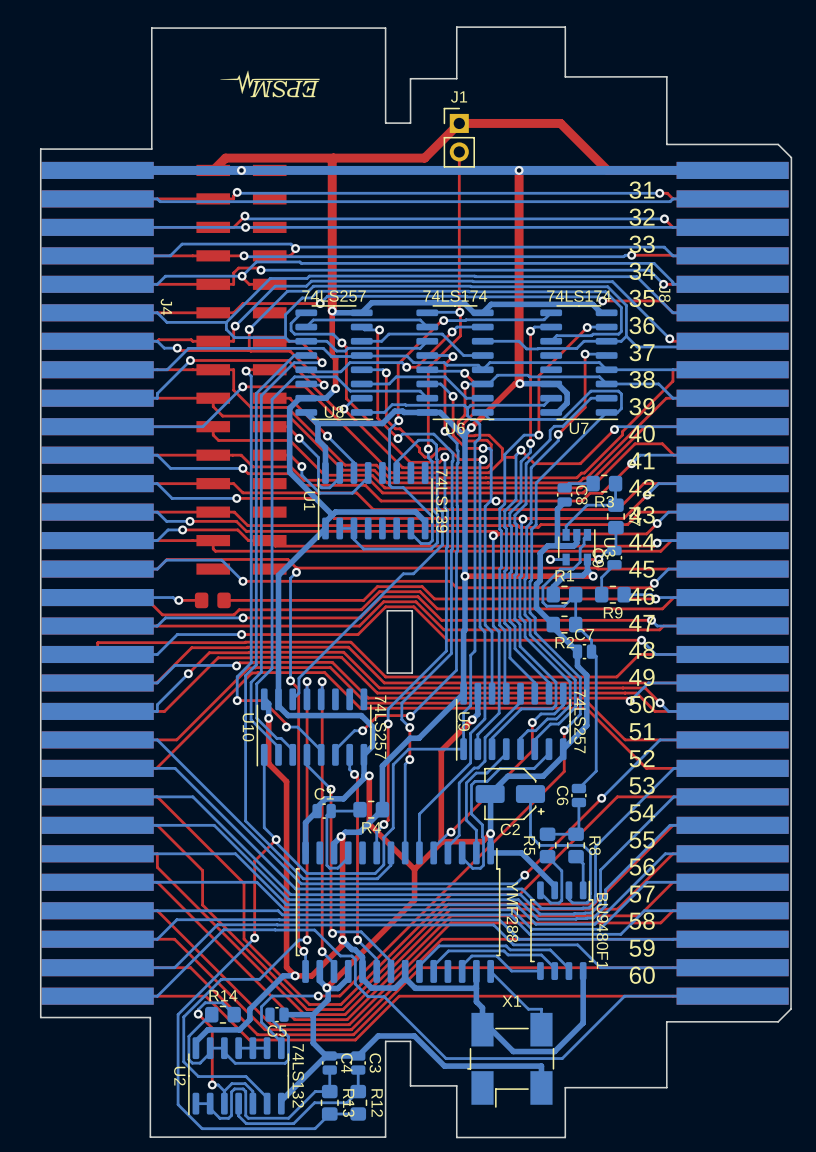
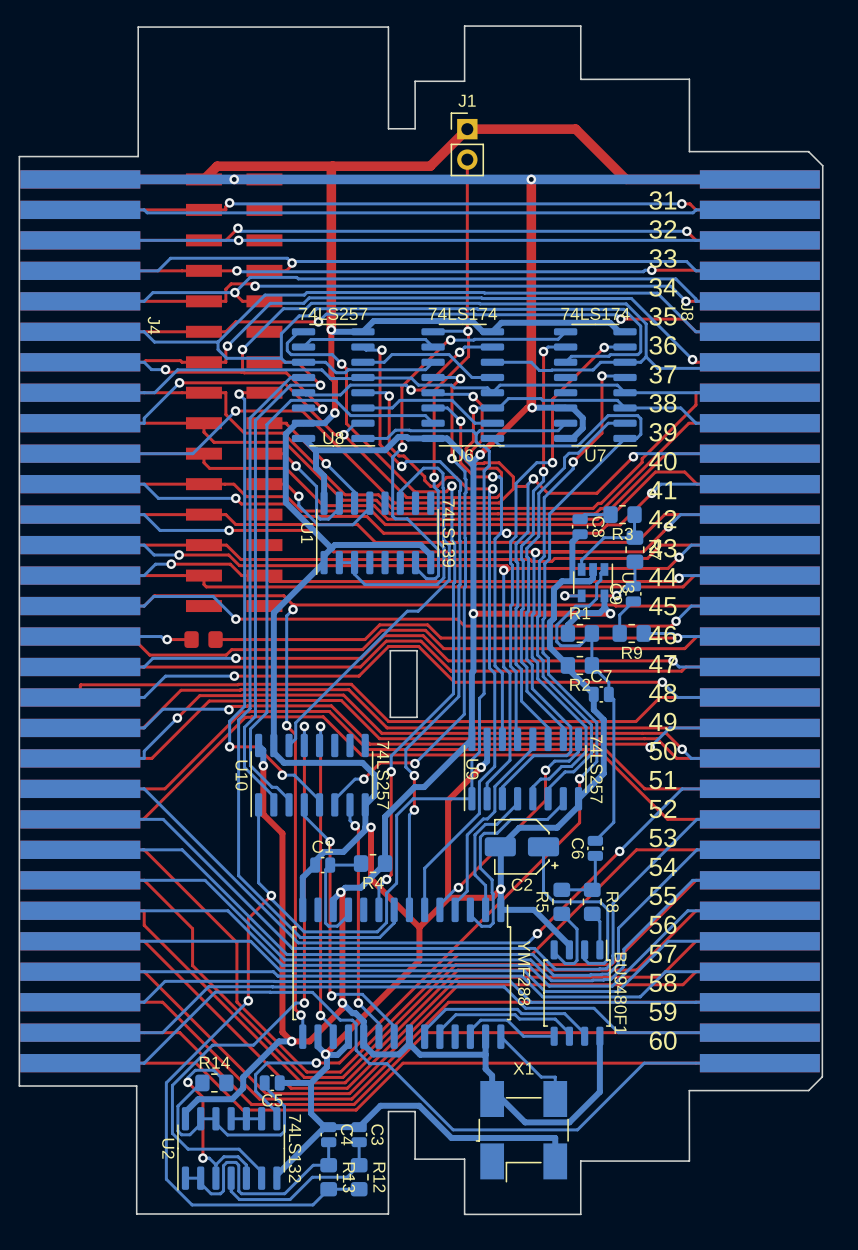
drawing: [220, 70, 320, 98] -> none

